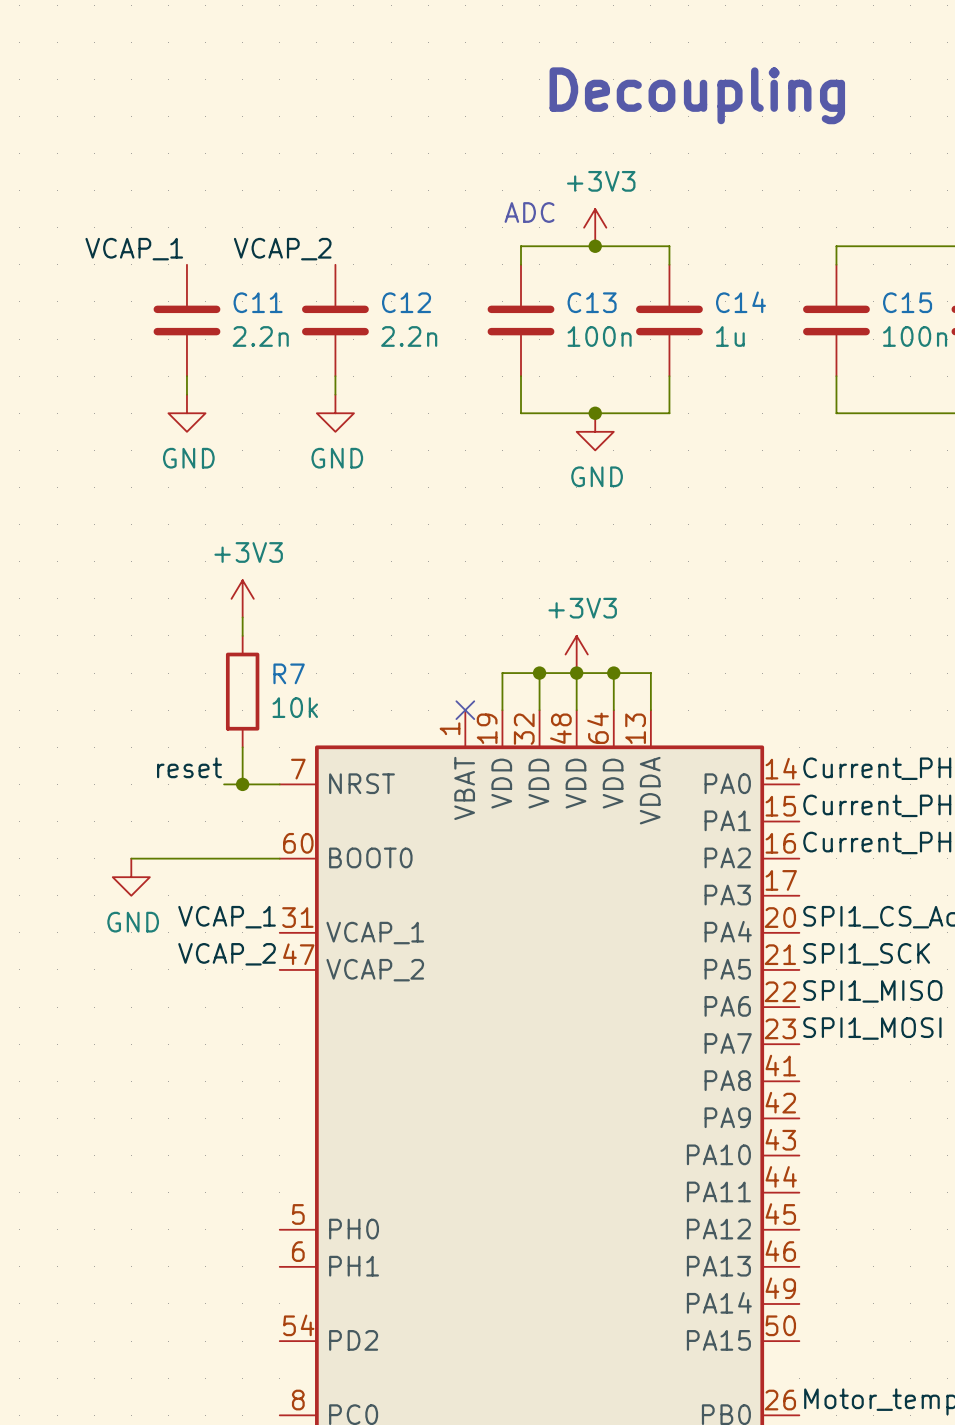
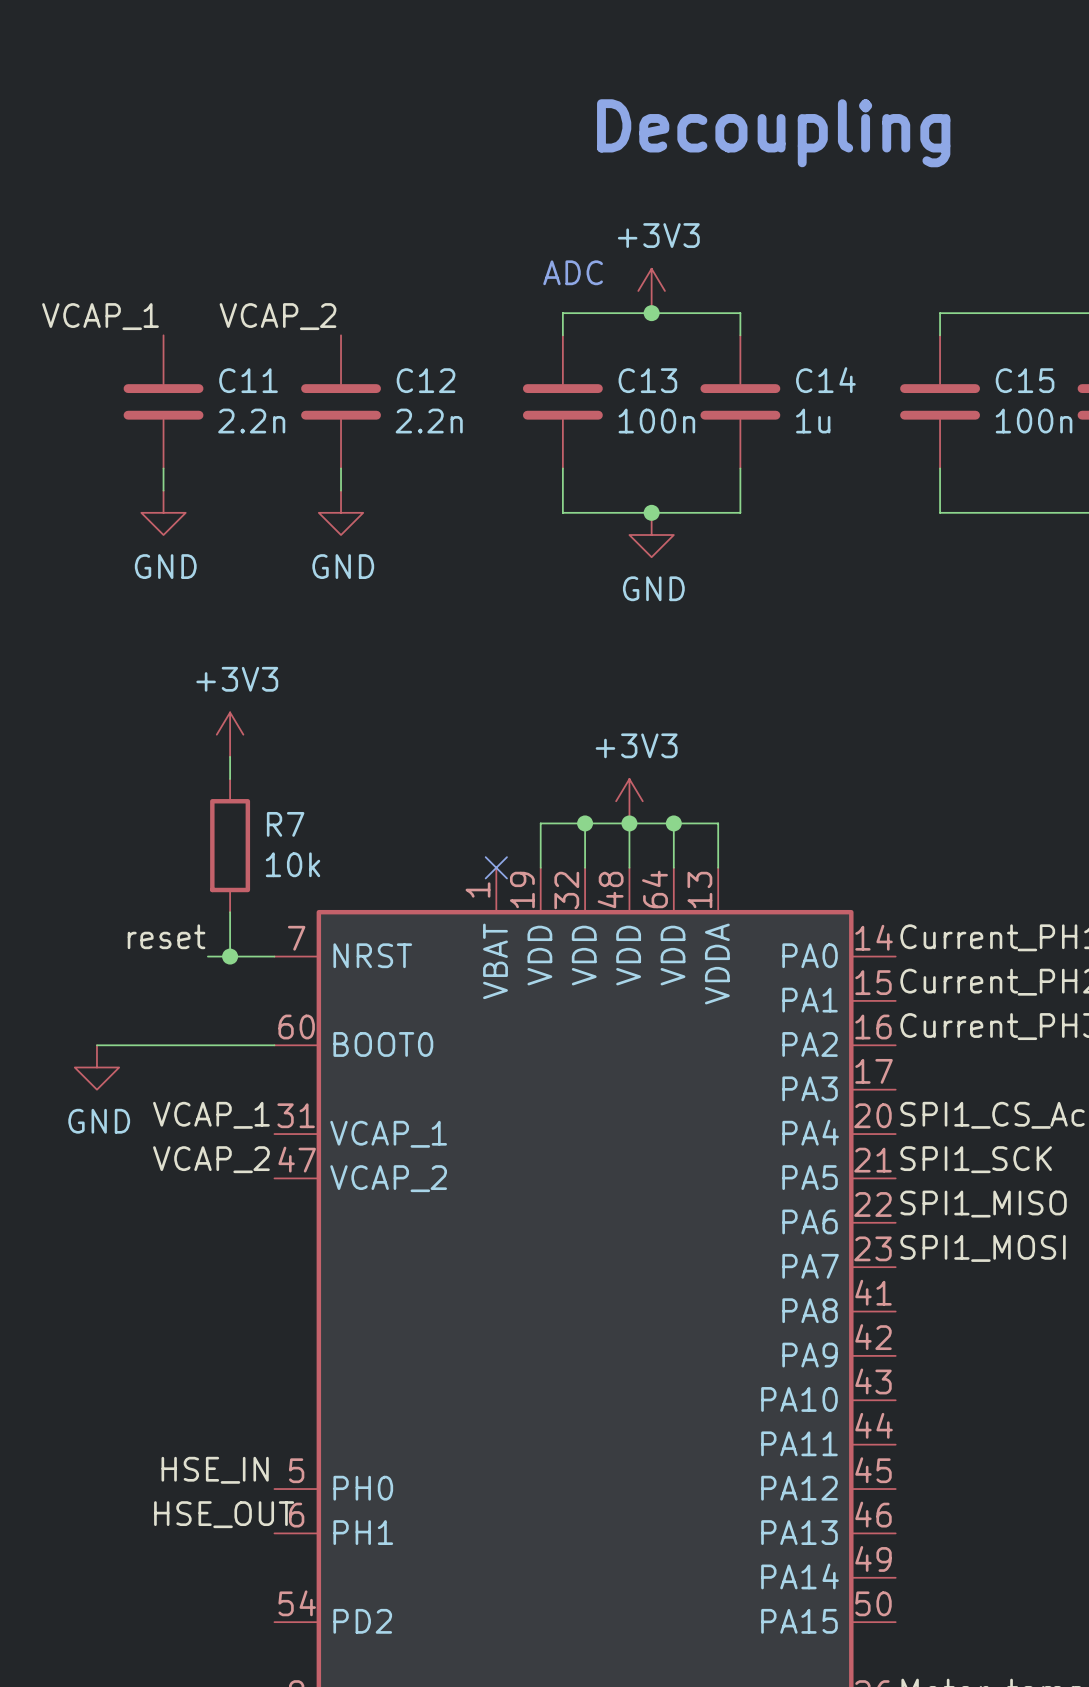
label: none -> HSE_IN (215, 1470)
label: none -> HSE_OUT (224, 1514)

